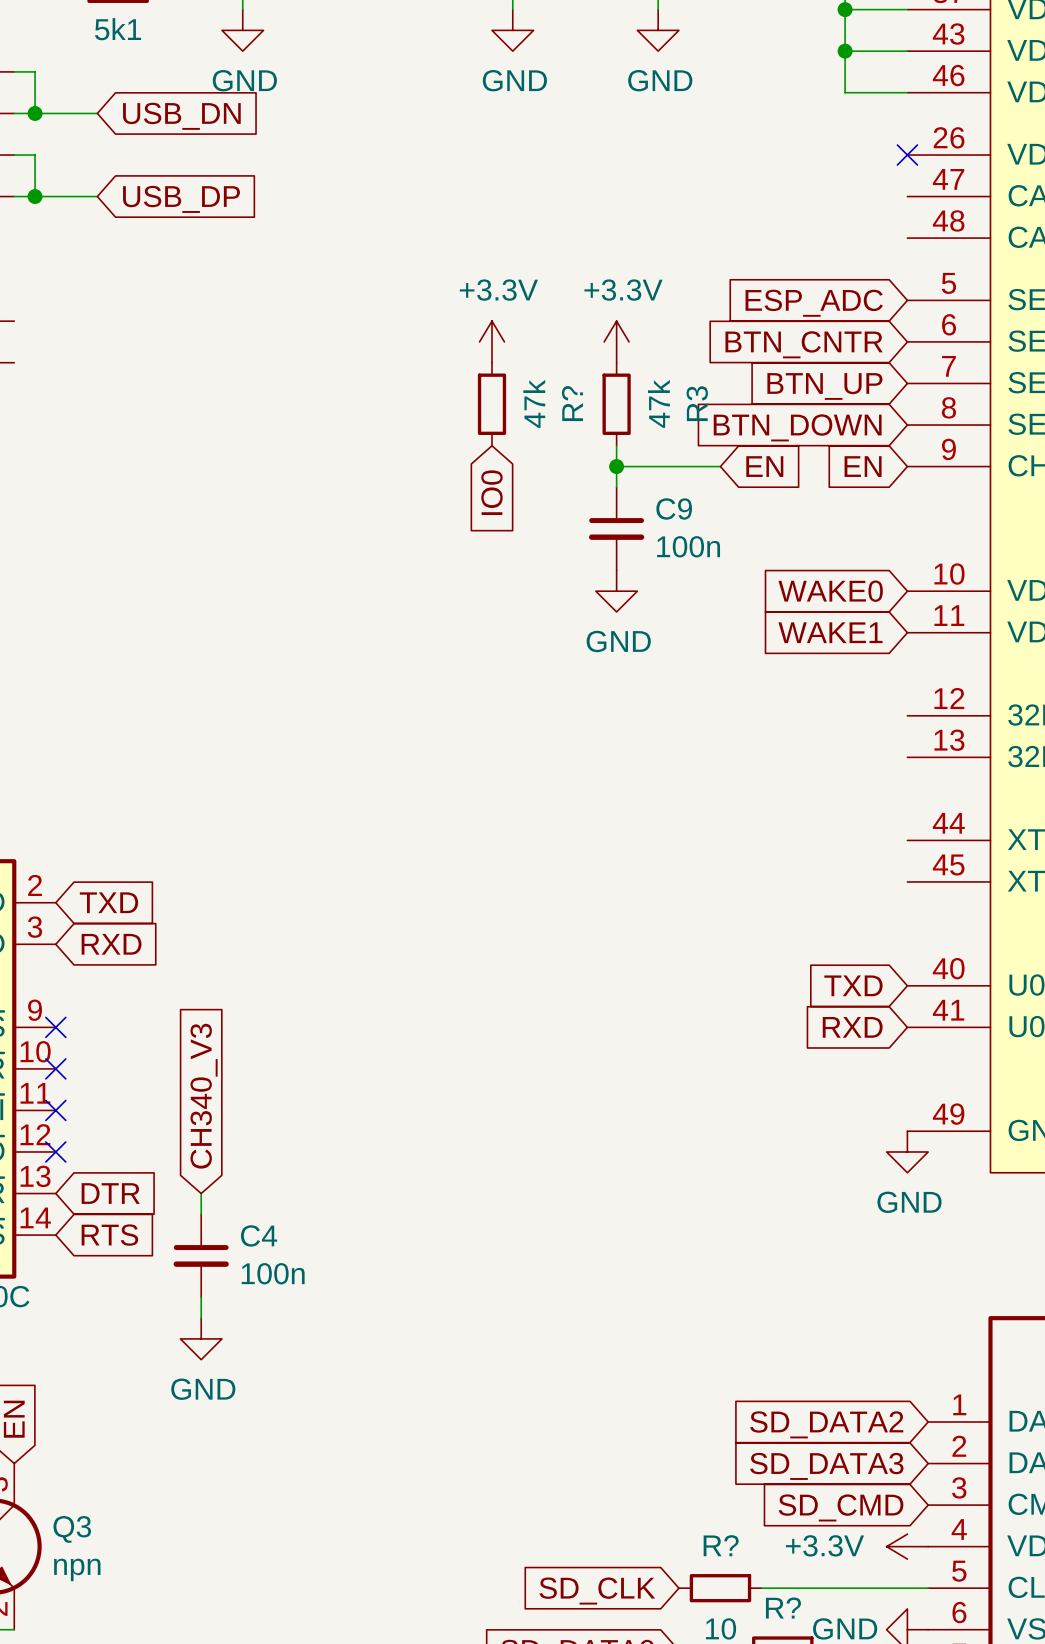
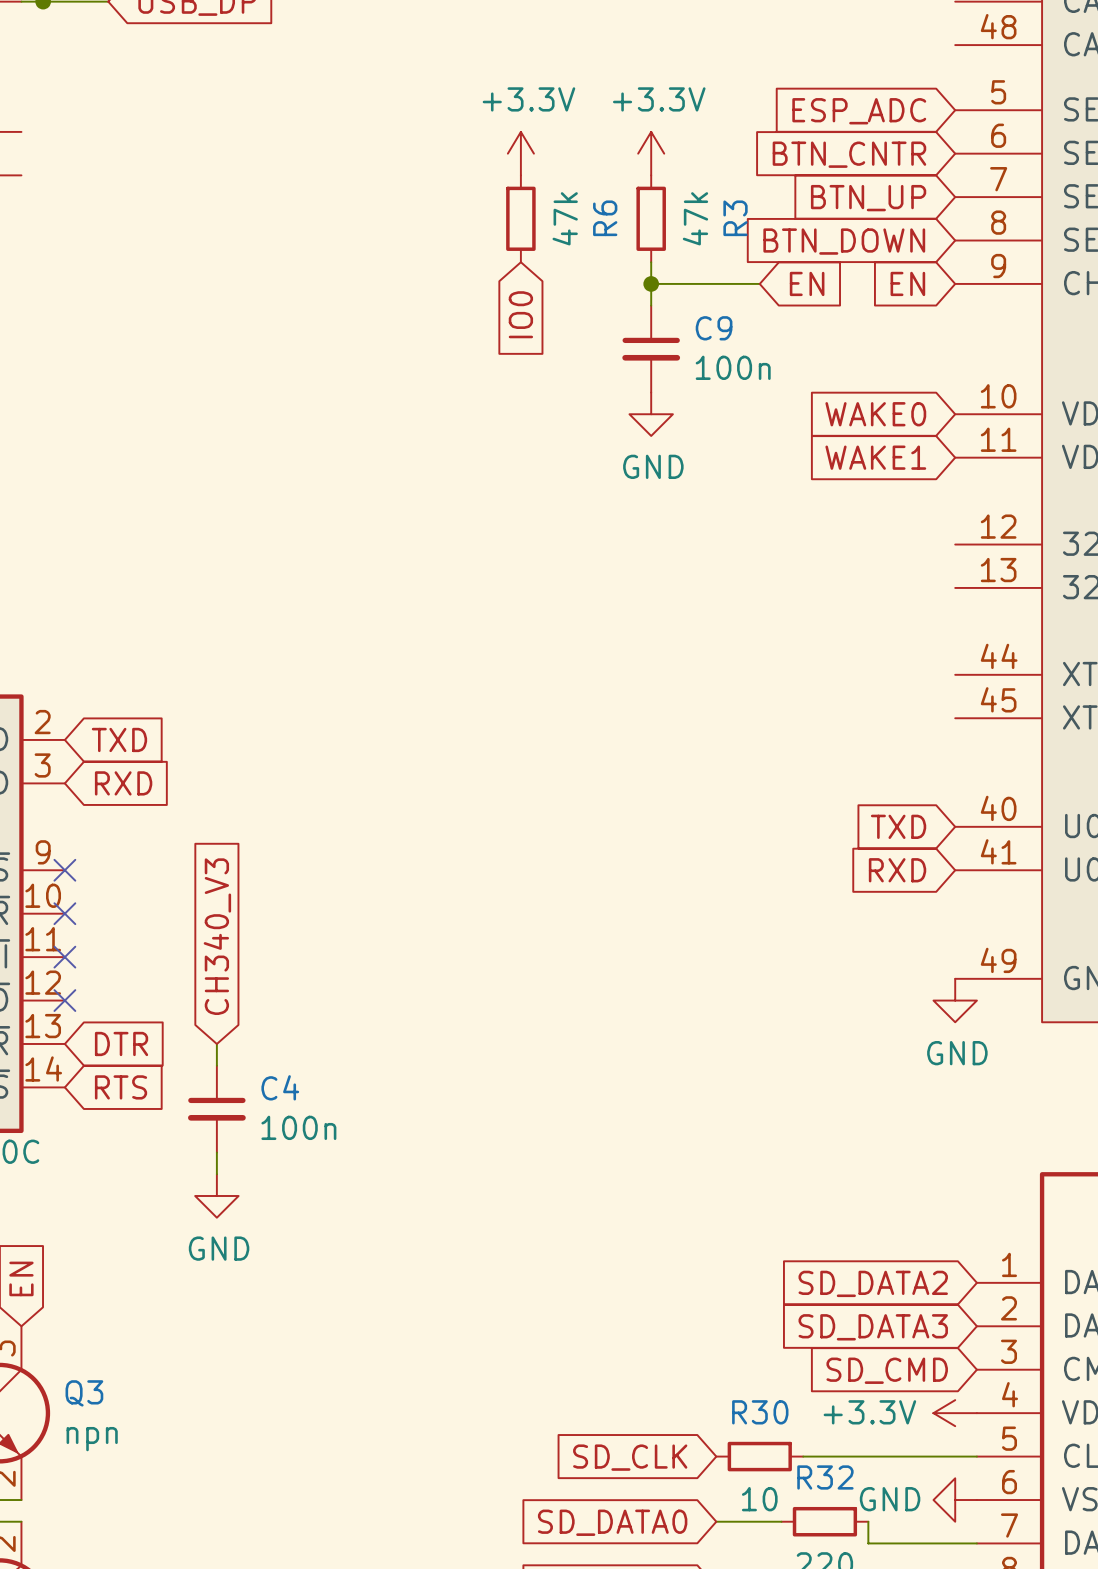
R? name: R? (572, 403) -> R6 (605, 218)
R? name: R? (721, 1545) -> R30 (760, 1412)
R? name: R? (783, 1608) -> R32 (825, 1477)

